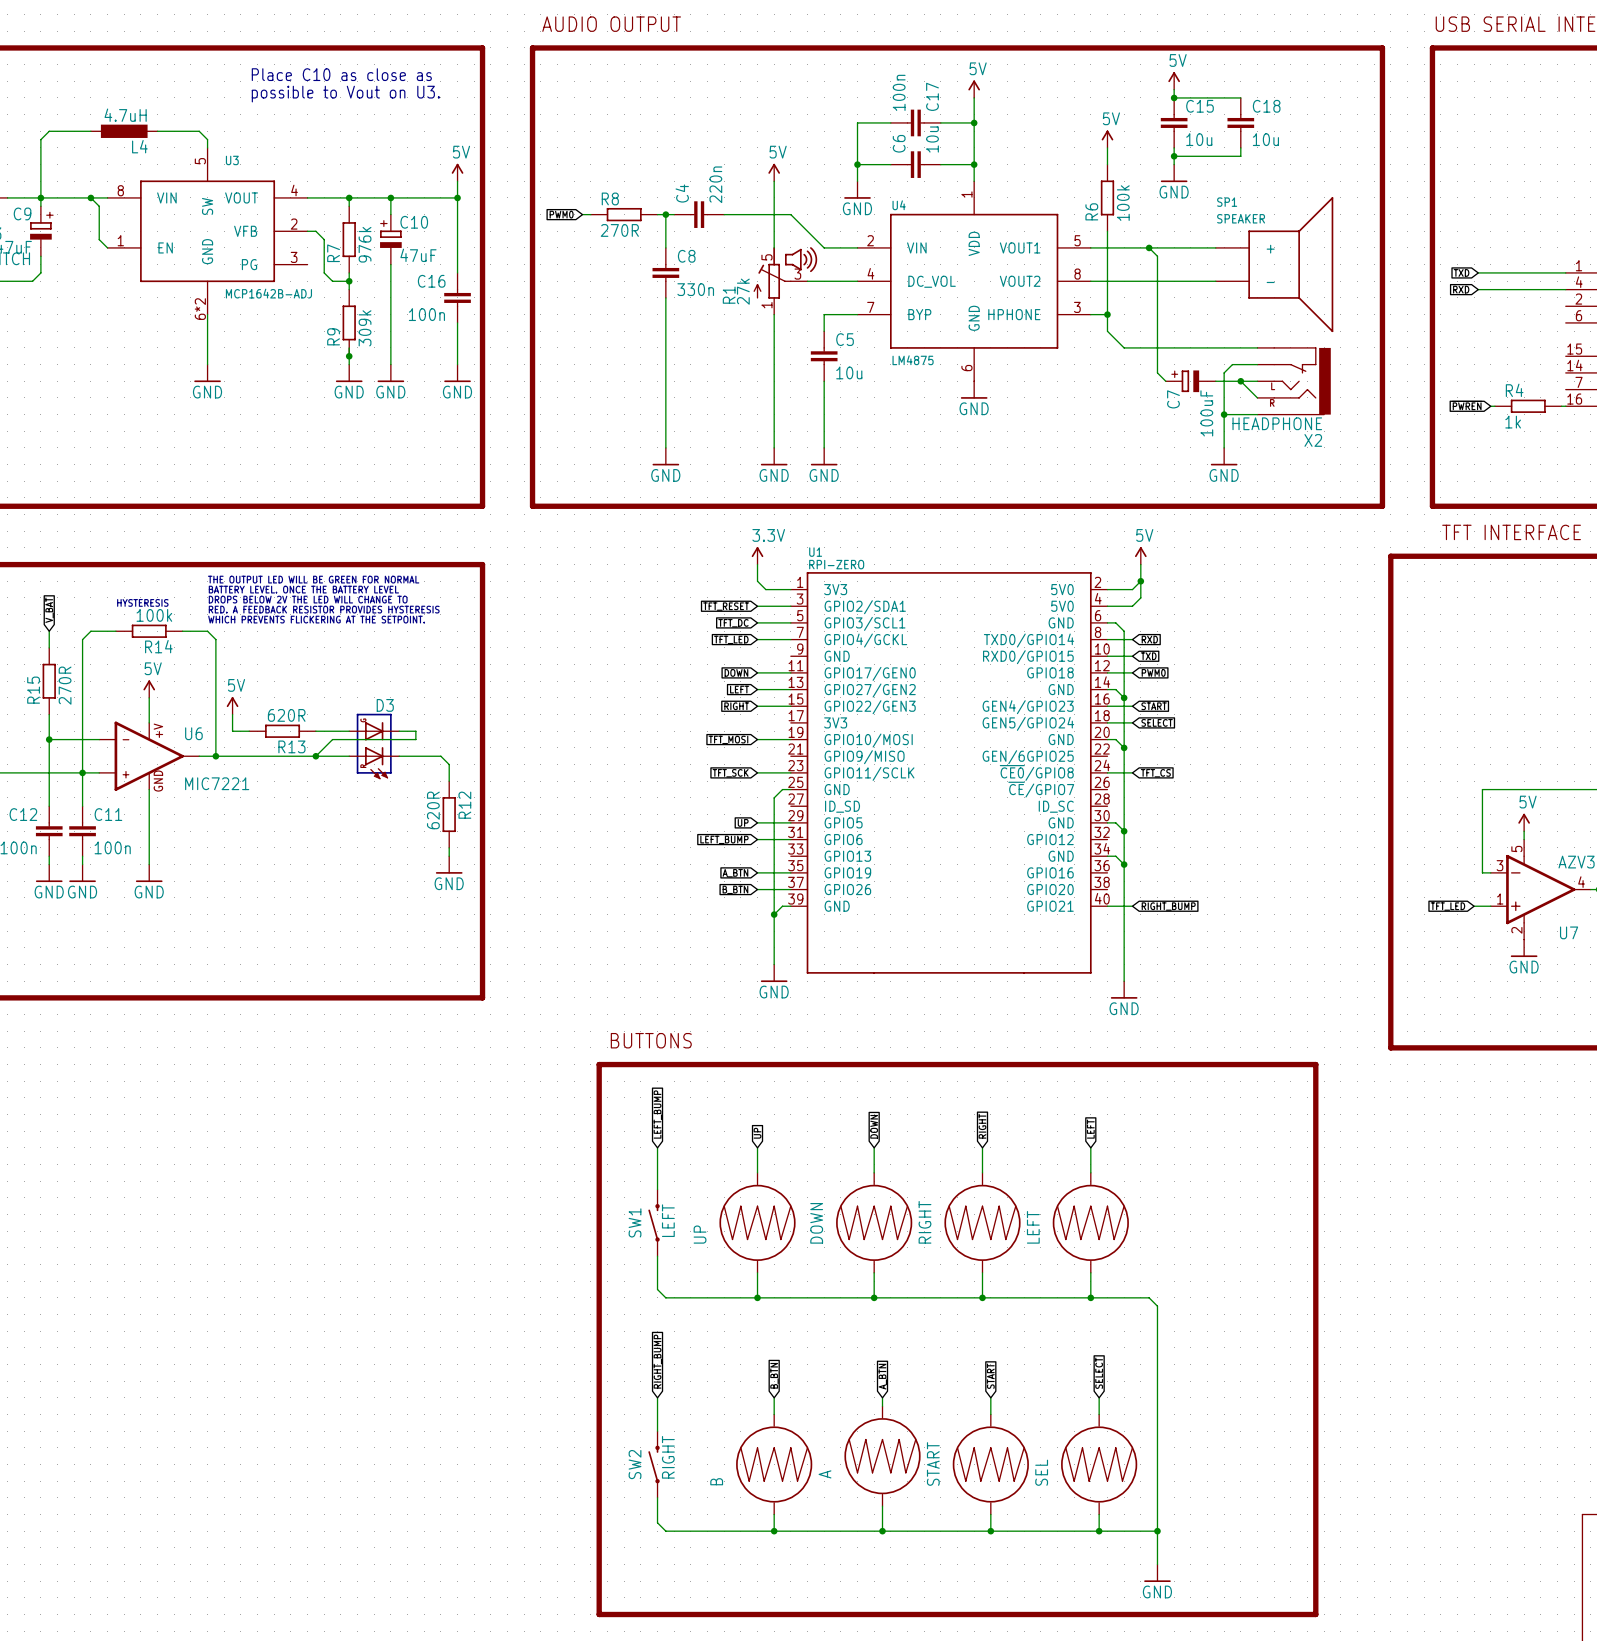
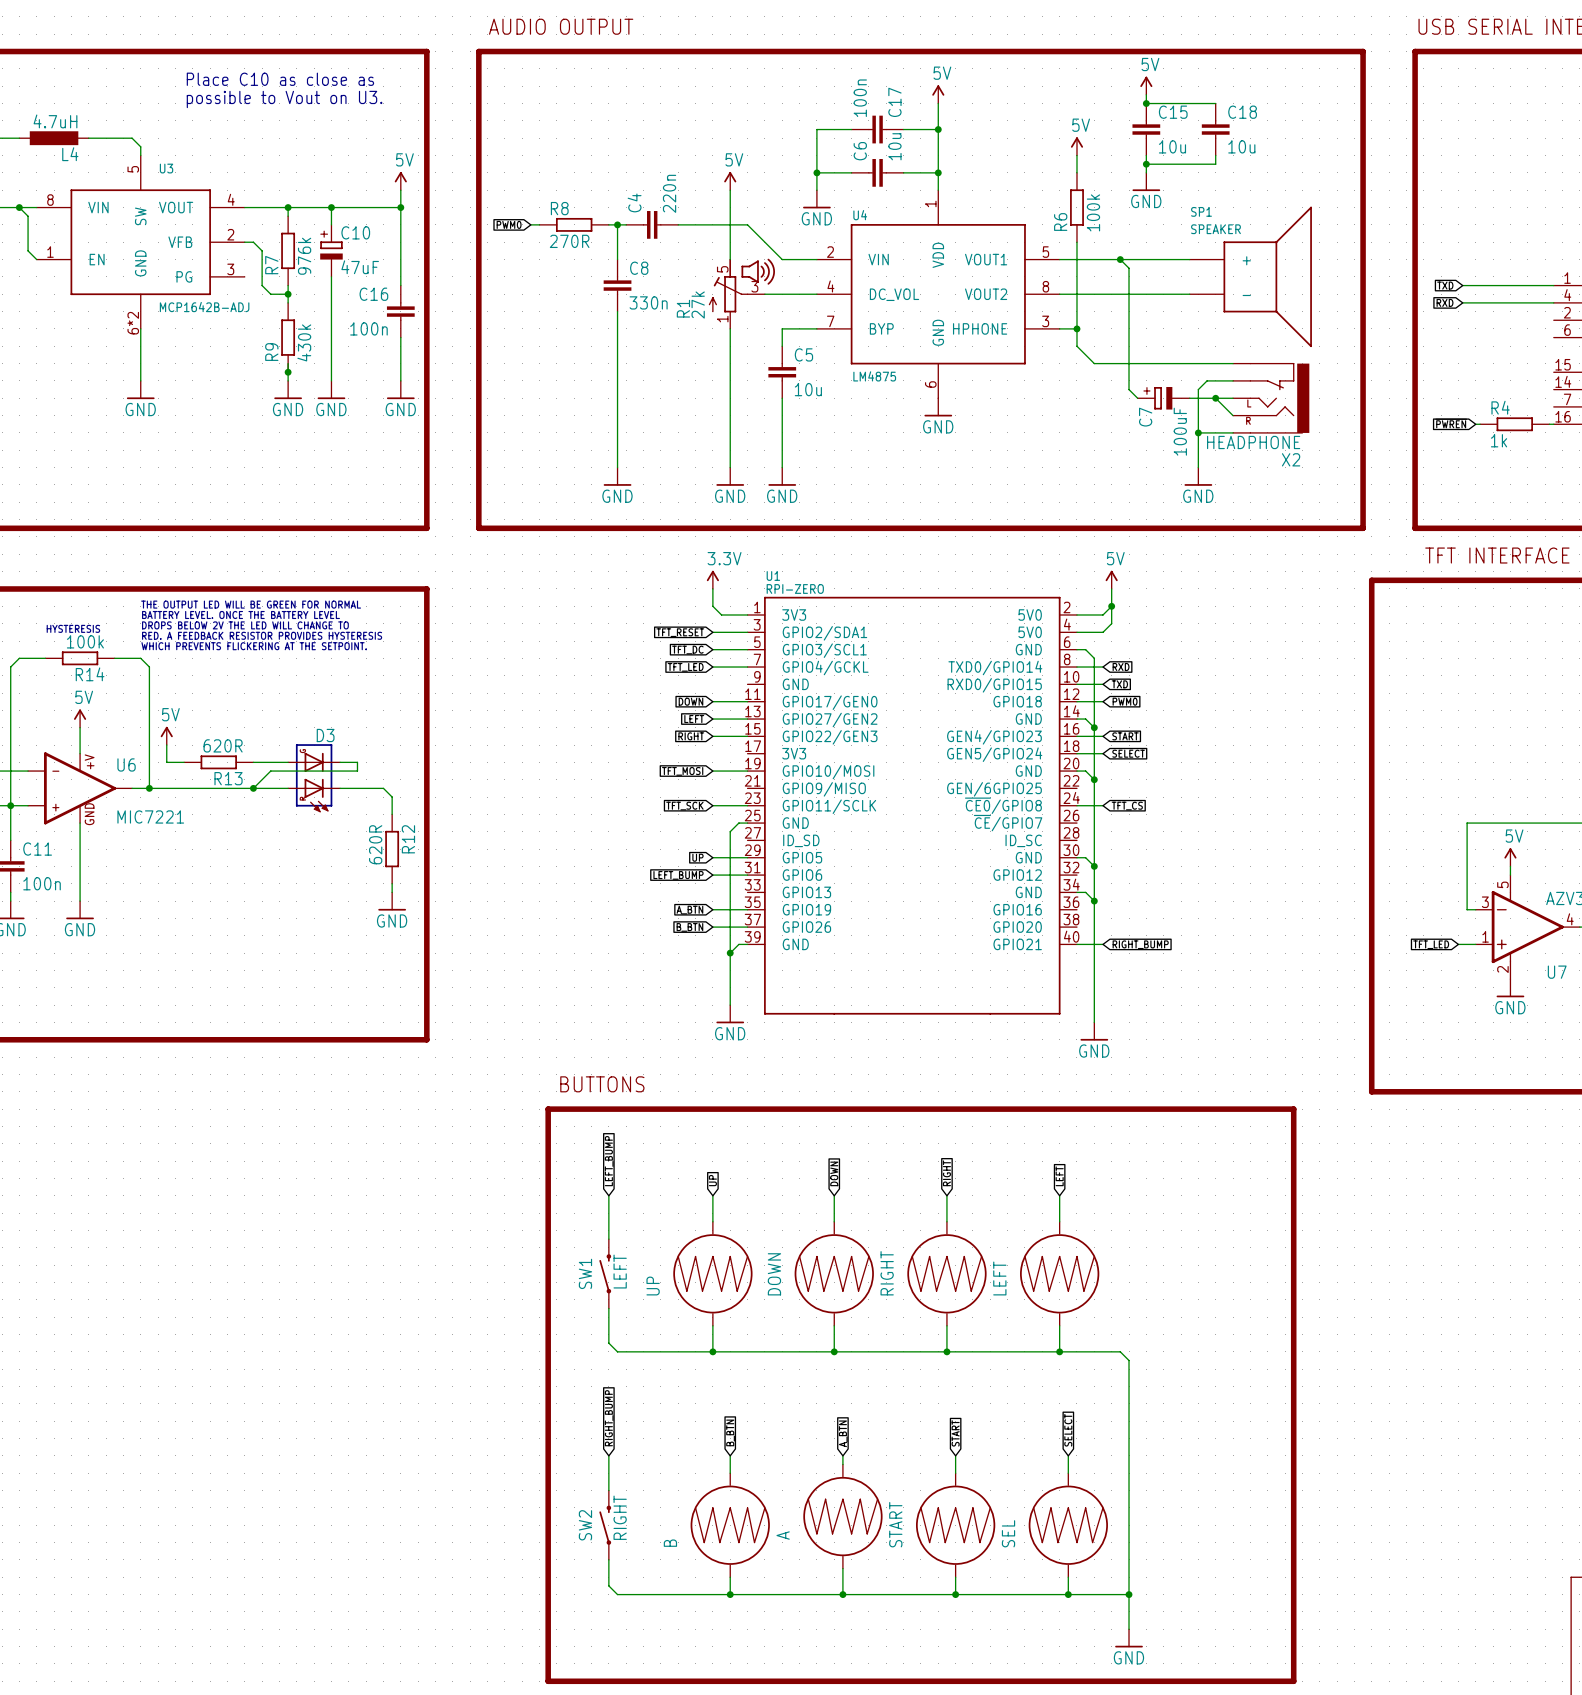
R9 value: 309k (365, 328) -> 430k (304, 342)

